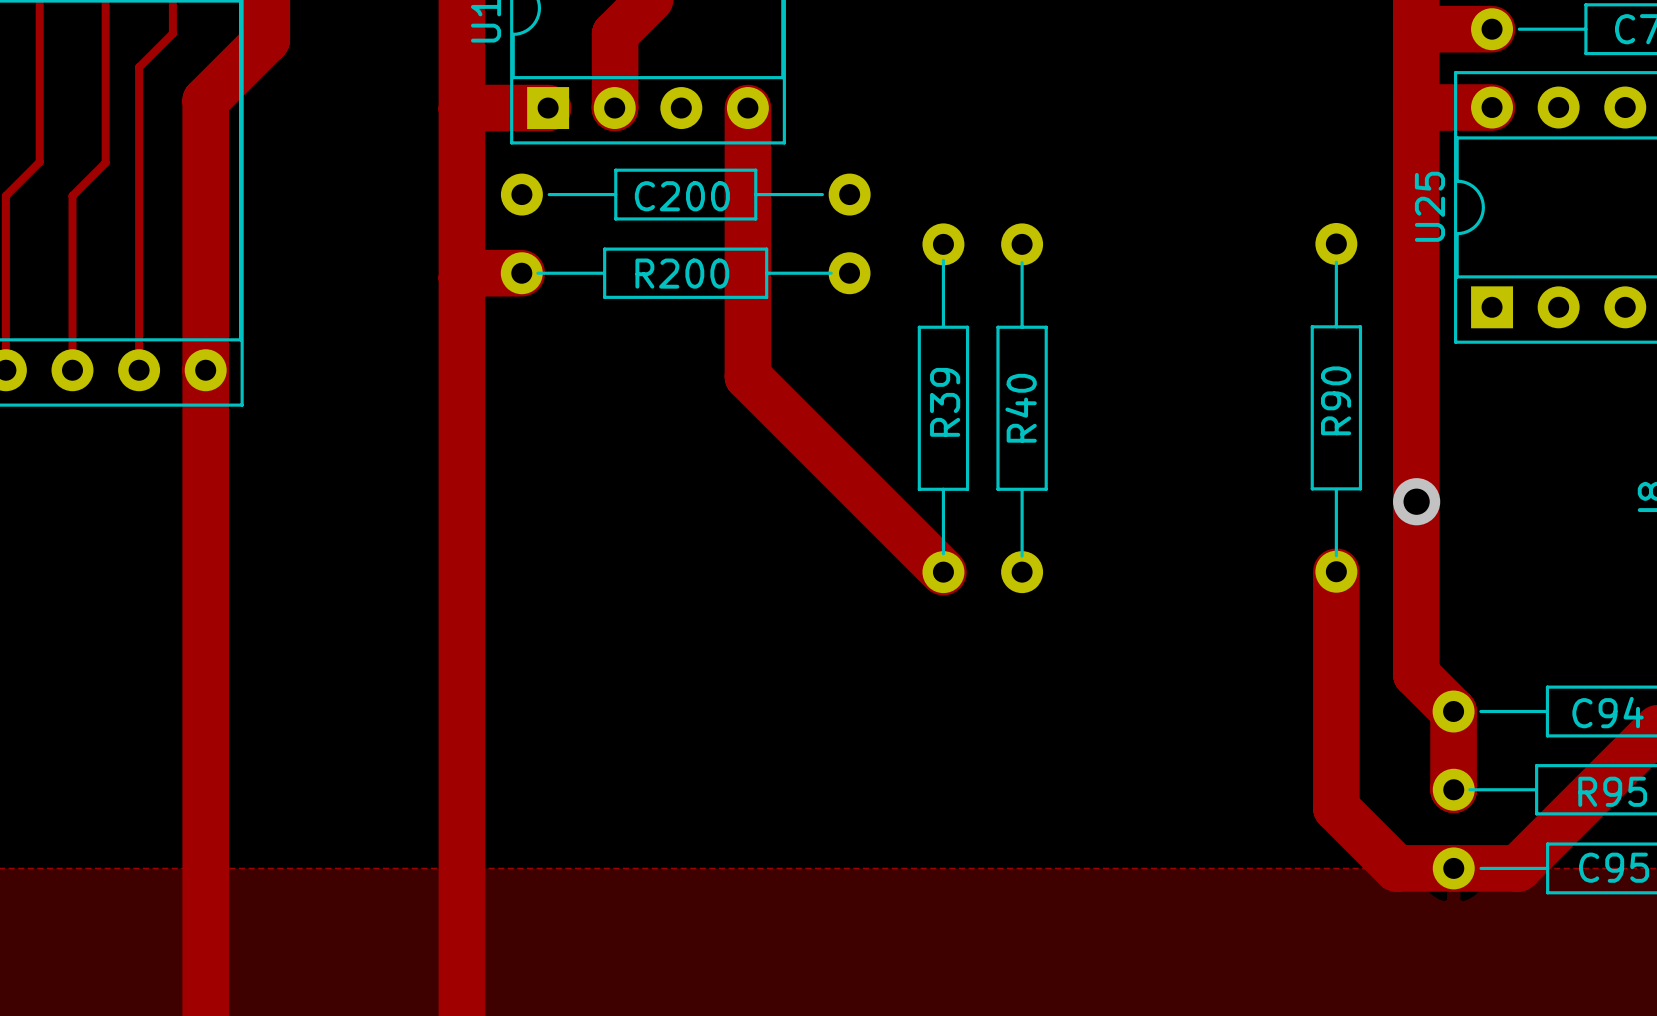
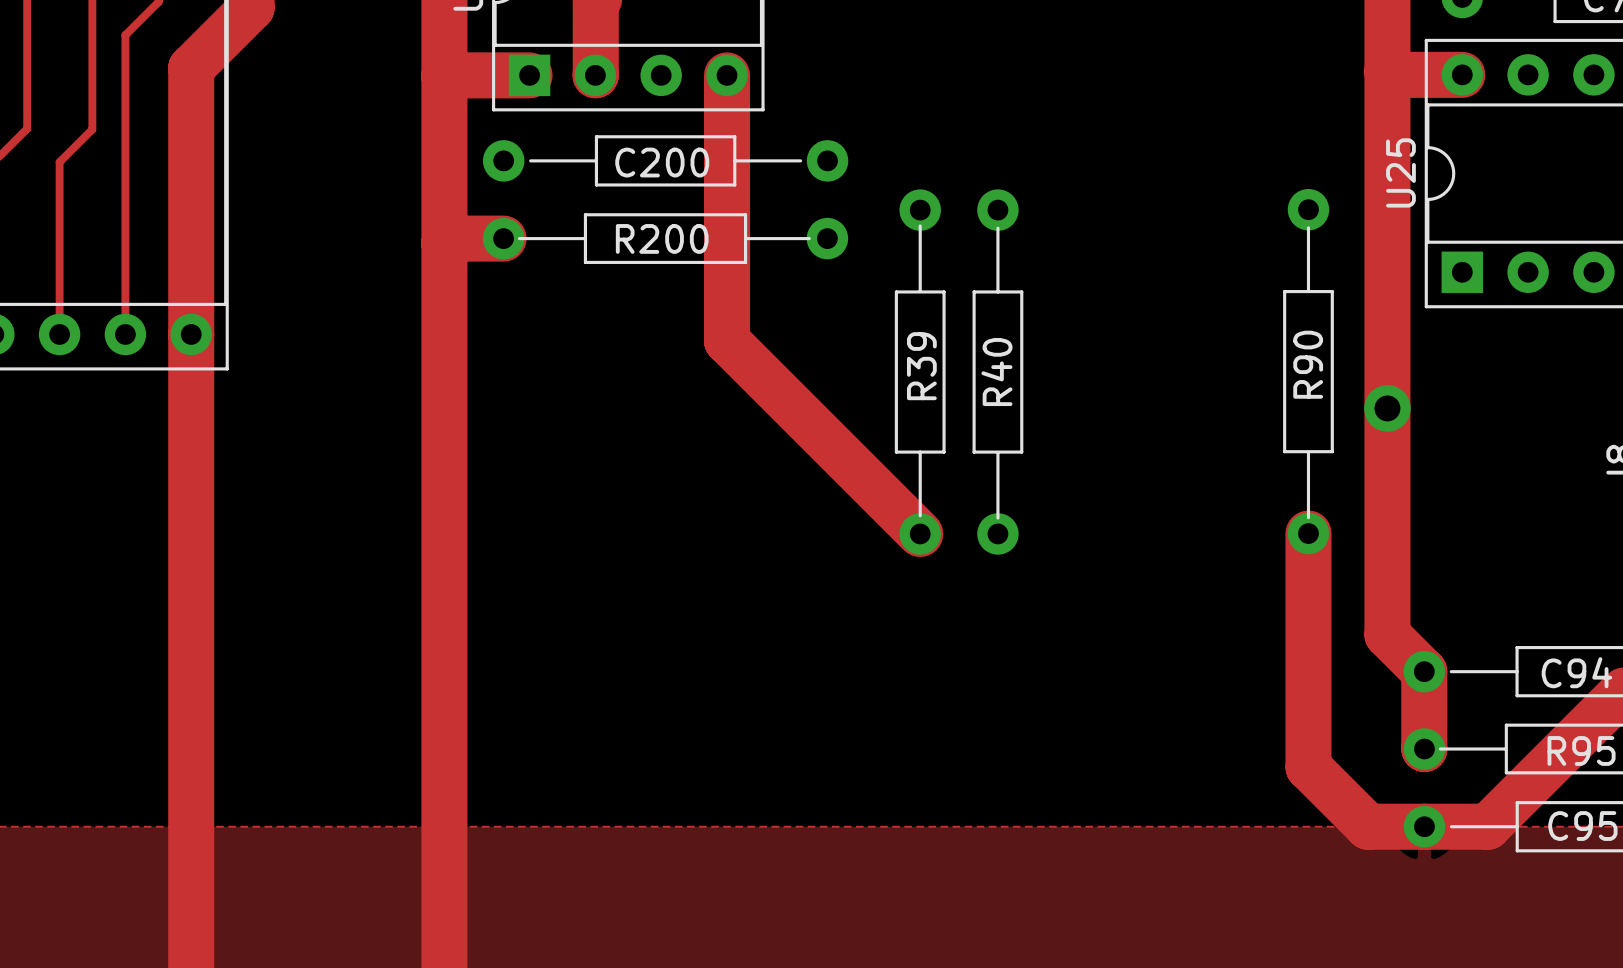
via position: (1416, 501) -> (1387, 408)

